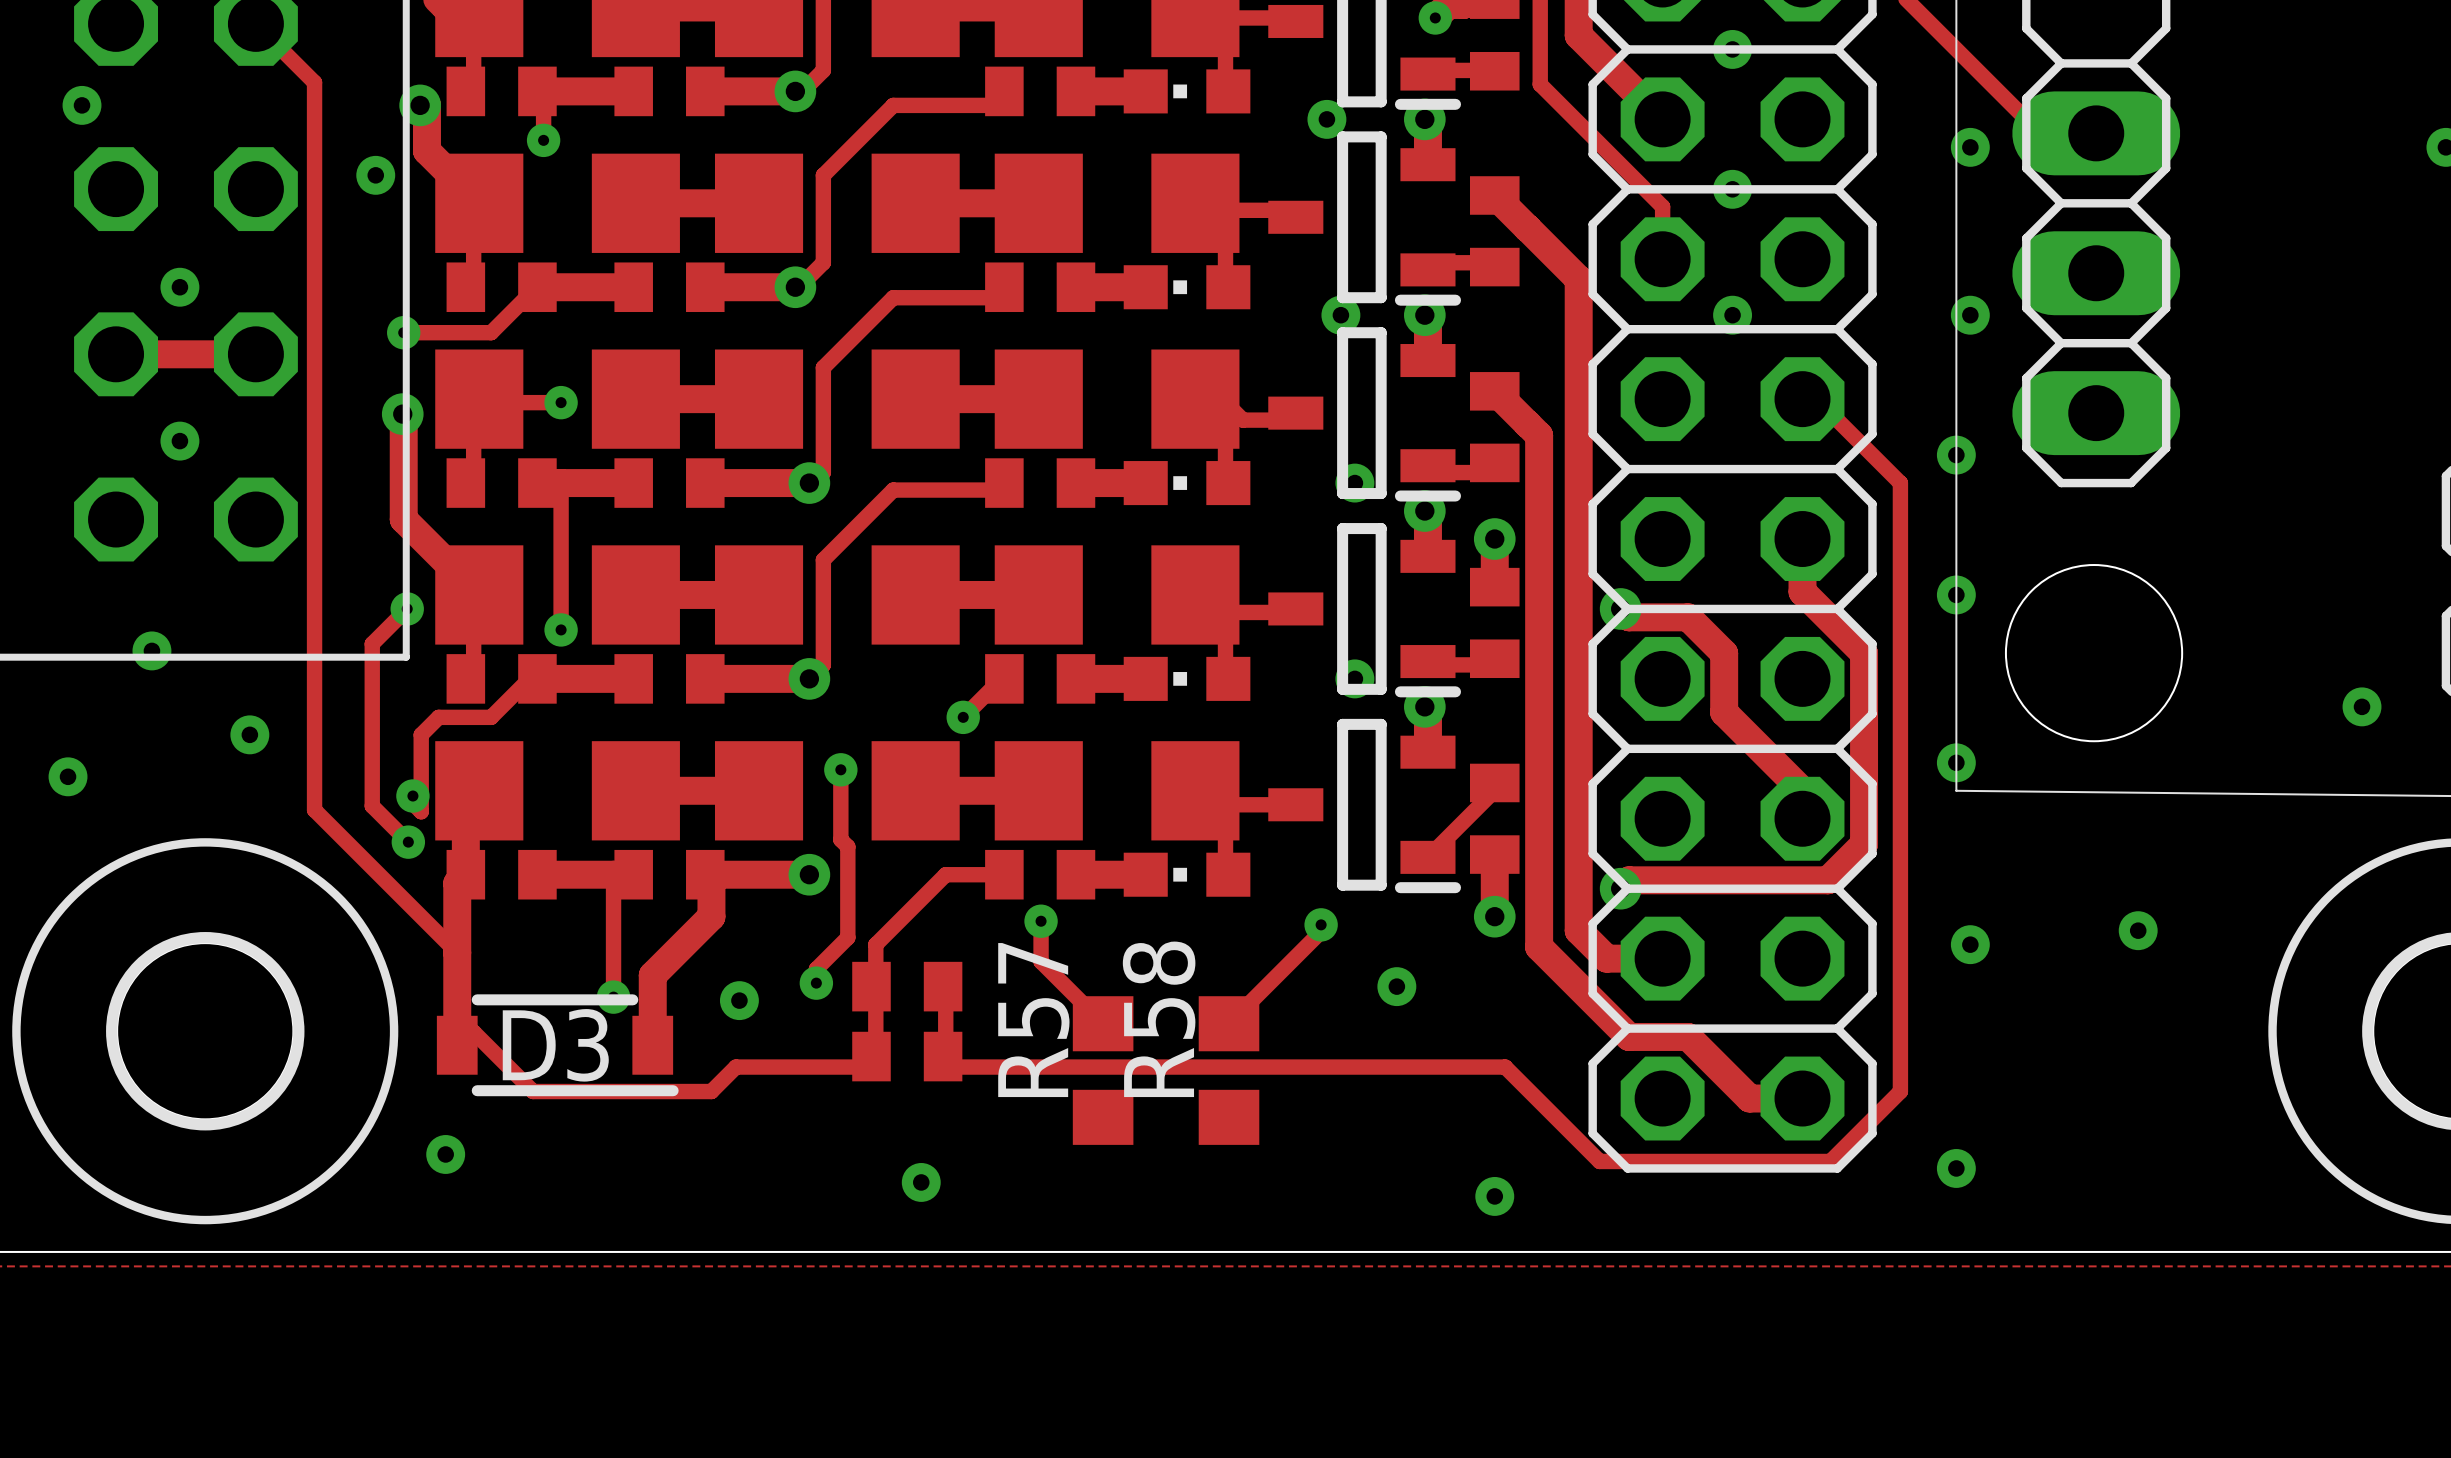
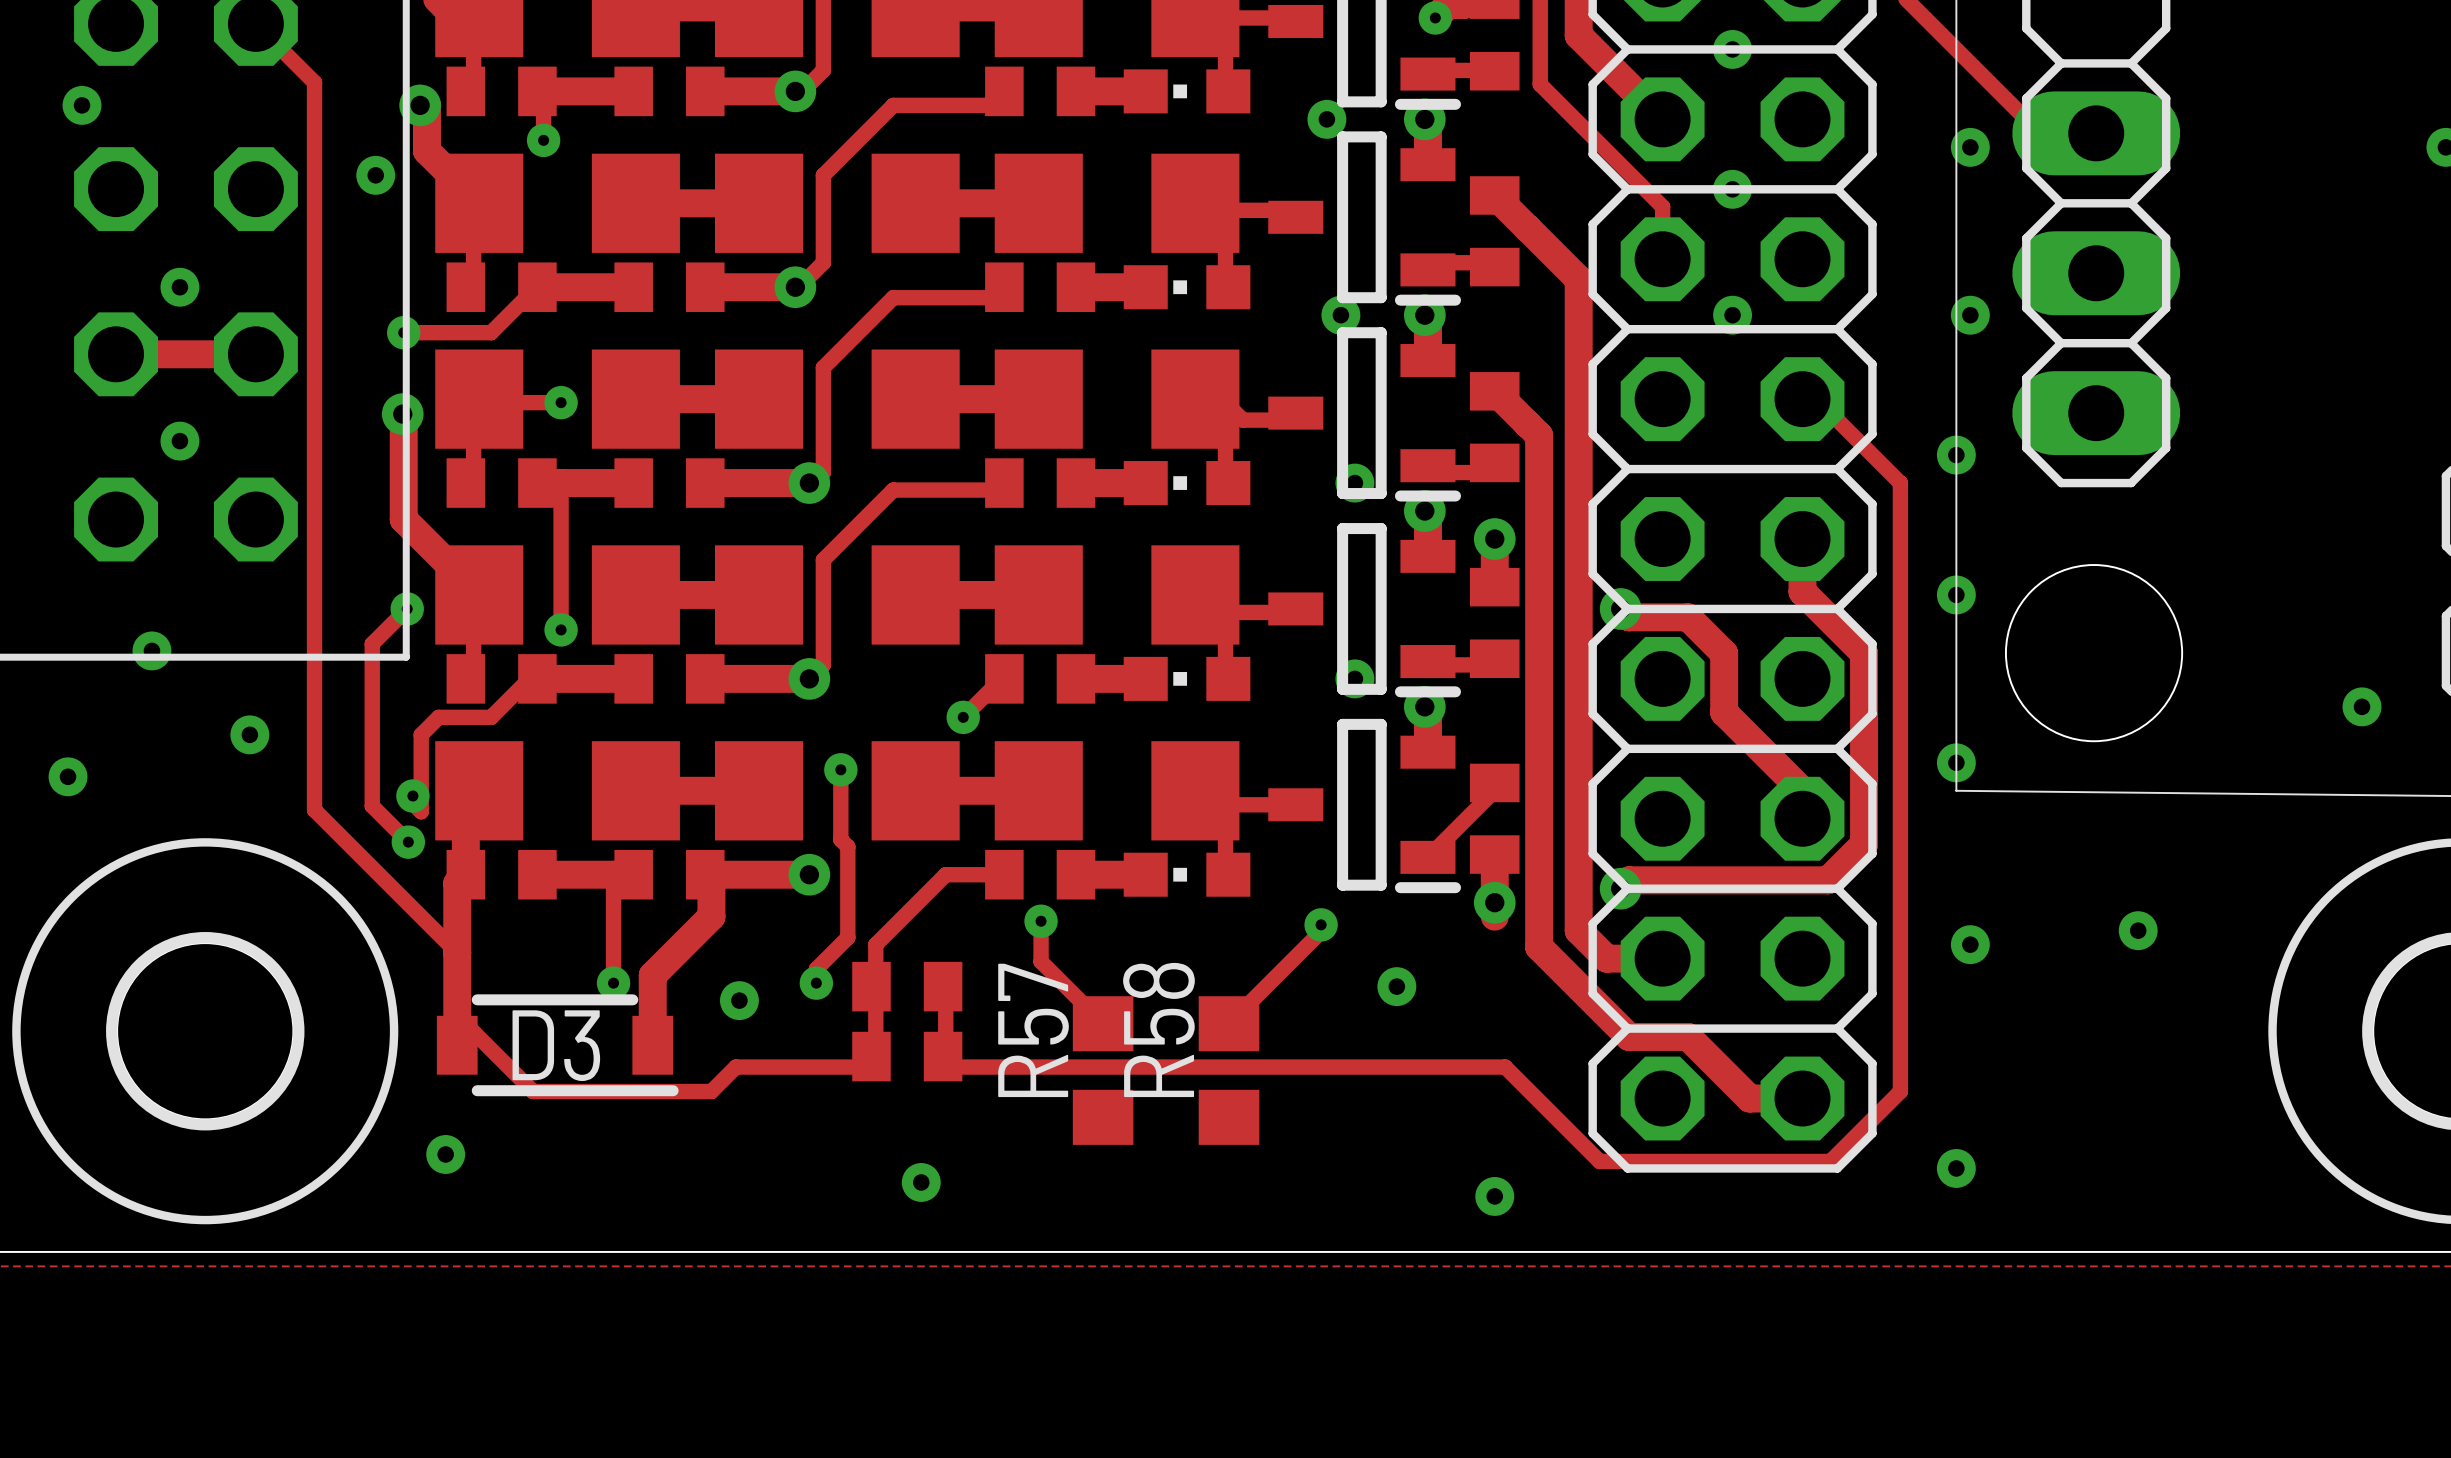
via position: (1494, 916) -> (1494, 902)
via position: (613, 997) -> (613, 983)

